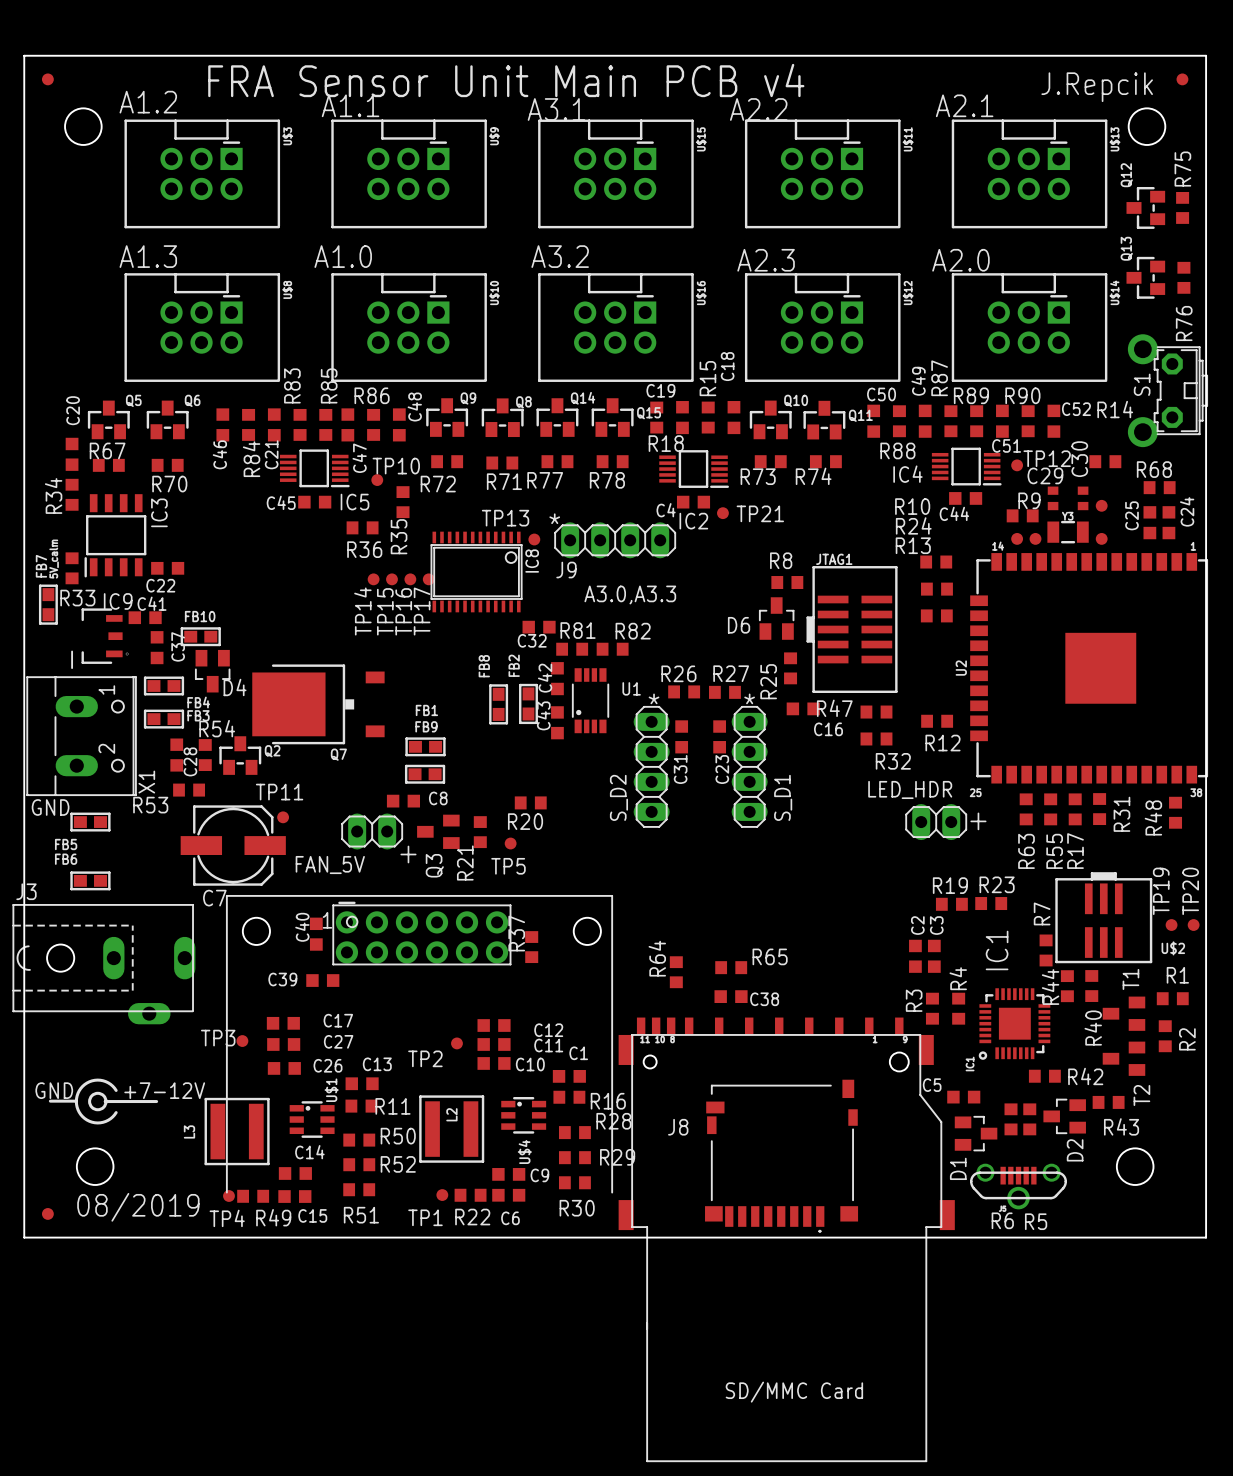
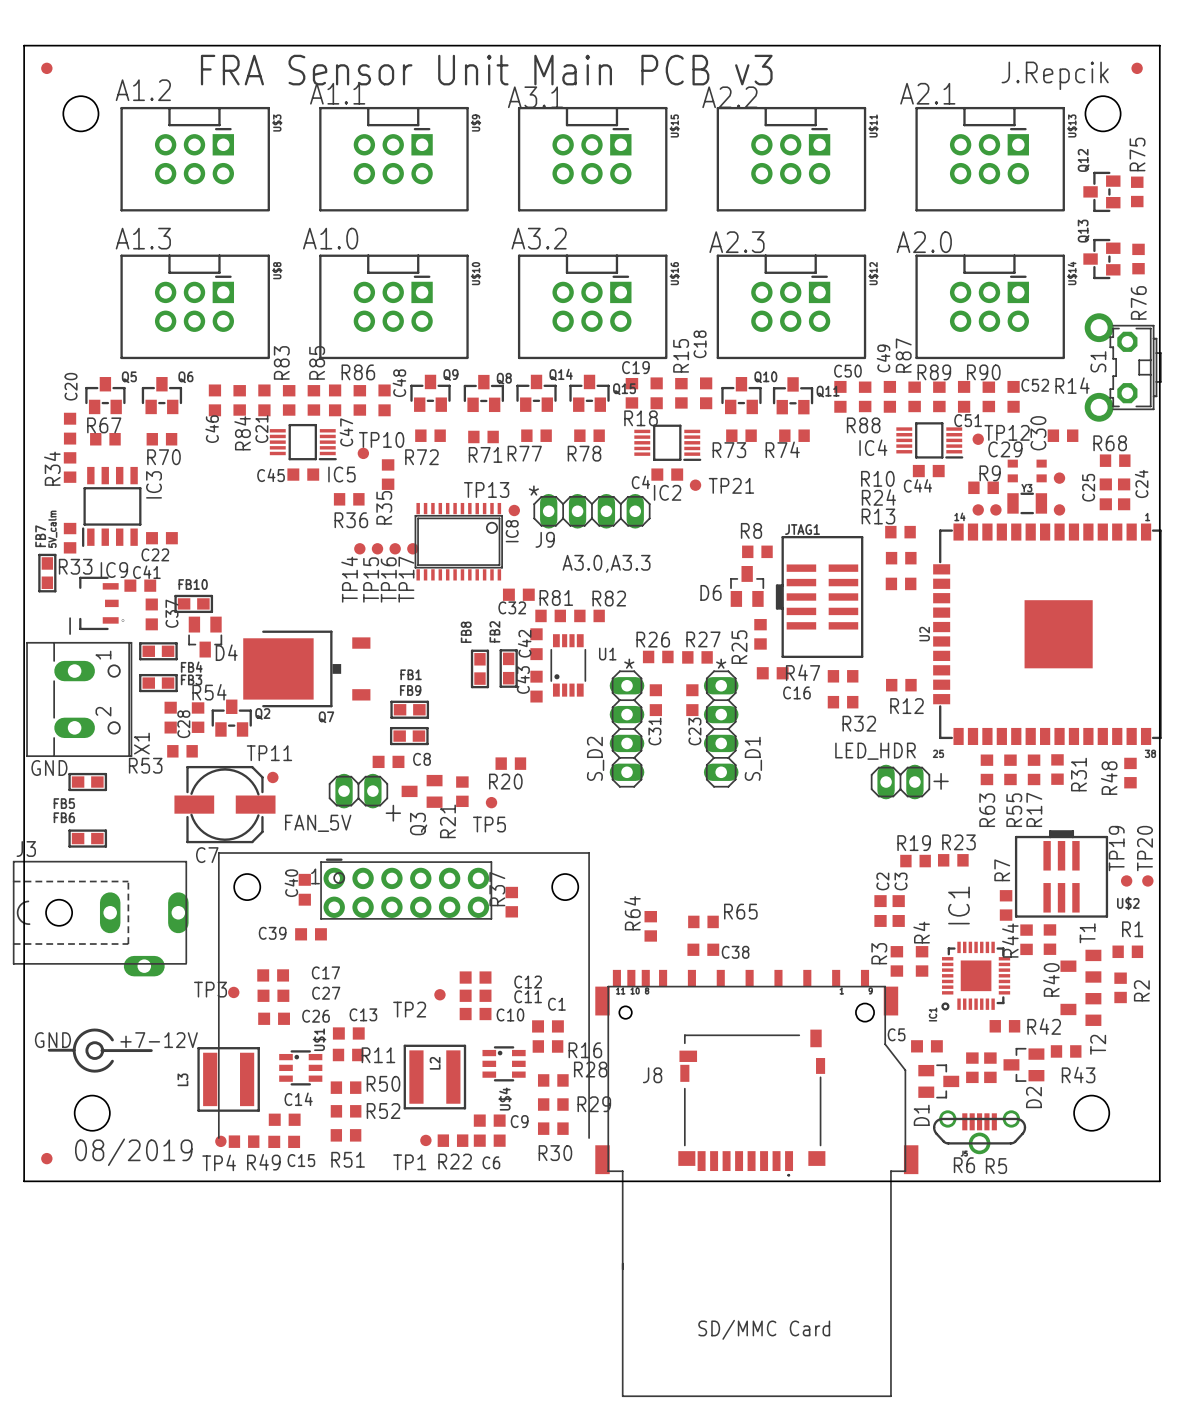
text: FRA Sensor Unit Main PCB v4 (506, 80) -> FRA Sensor Unit Main PCB v3 (486, 70)

